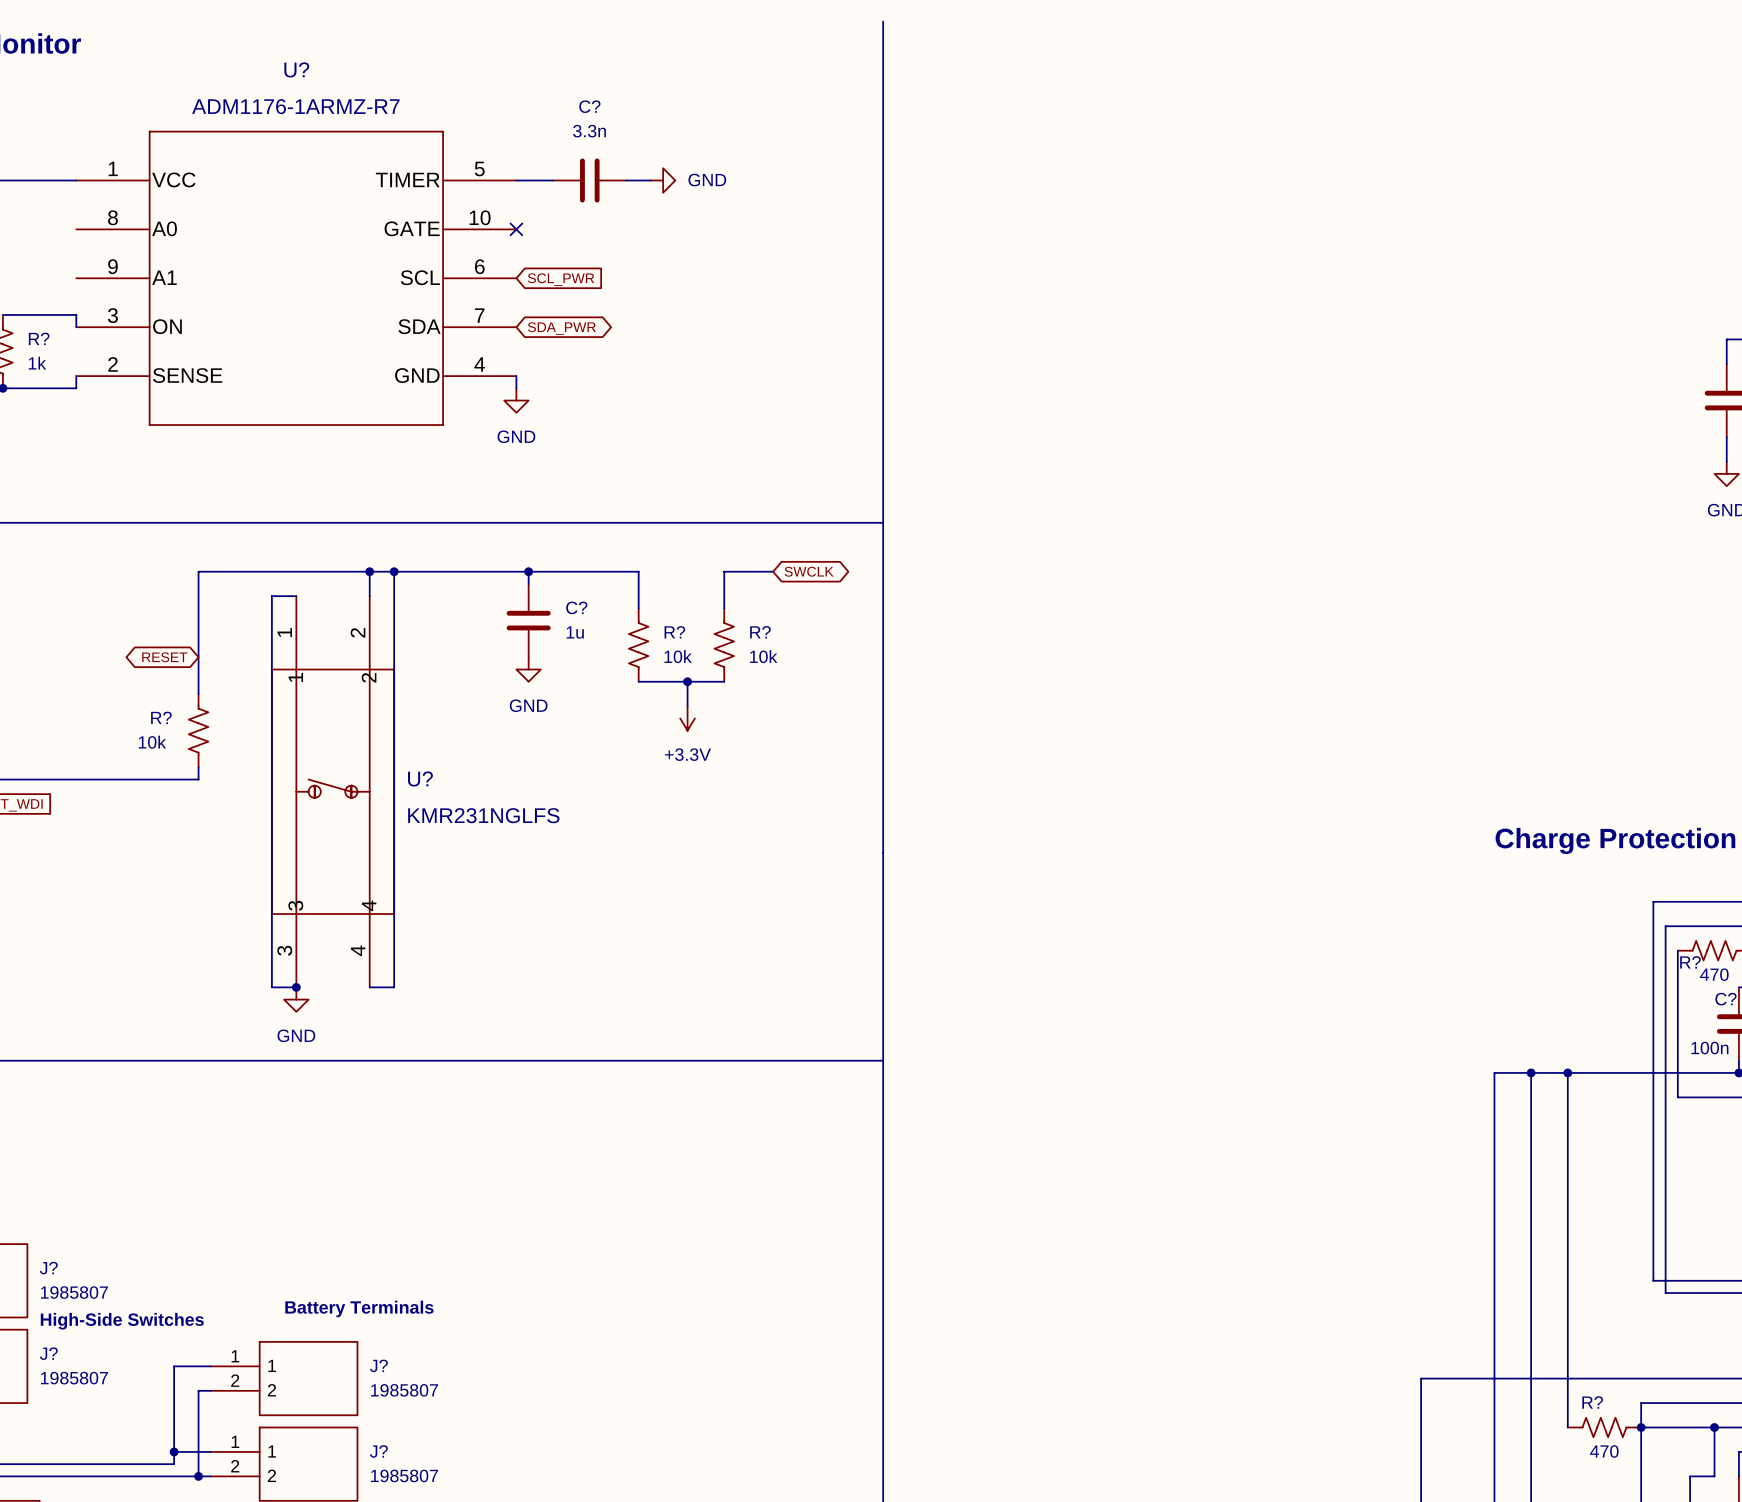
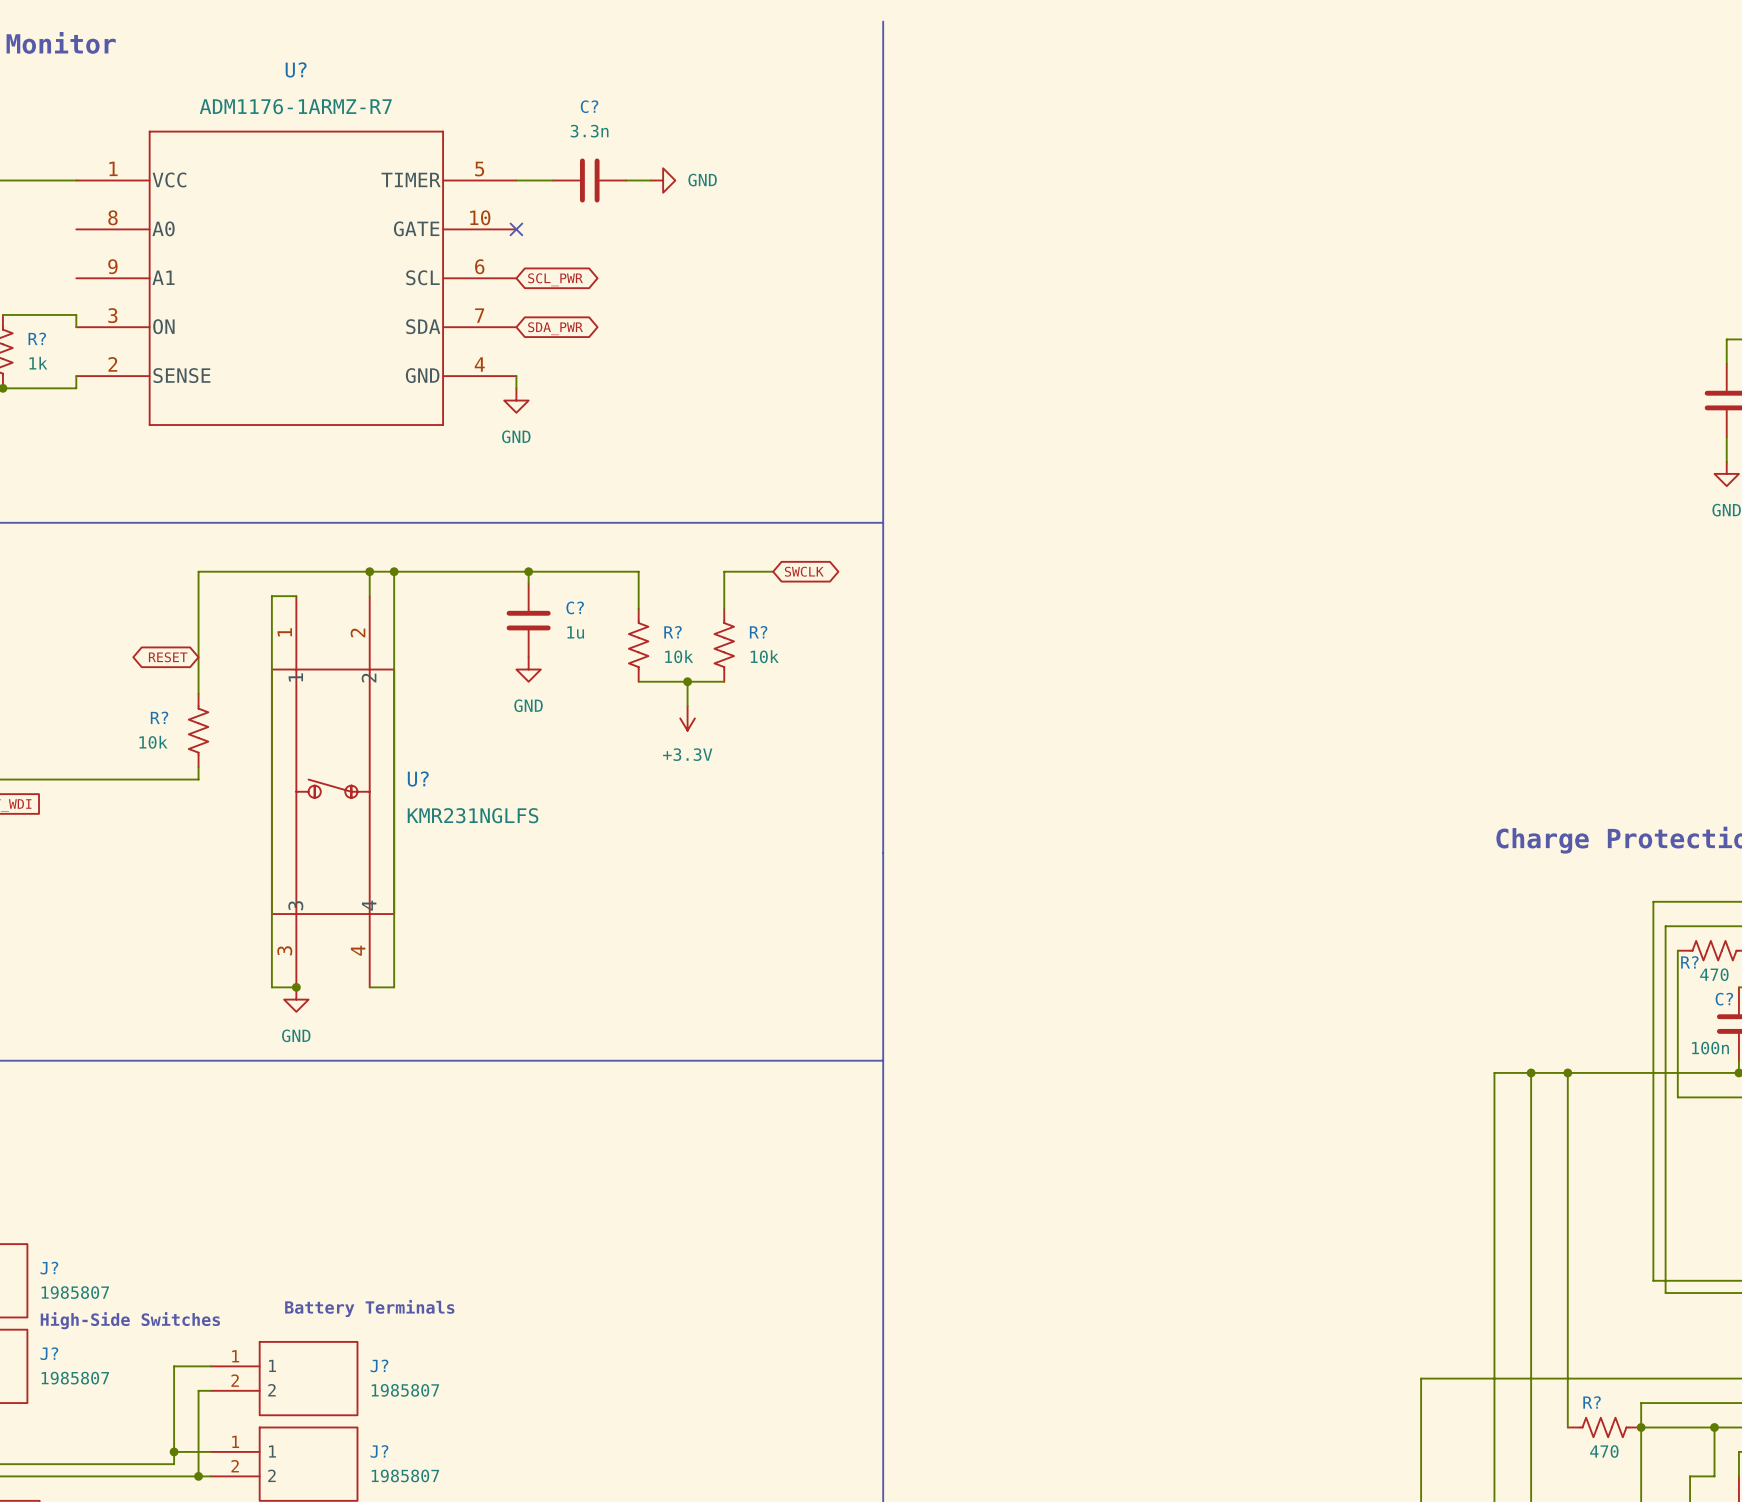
global label shape: input (561, 279) -> bidirectional (555, 279)

